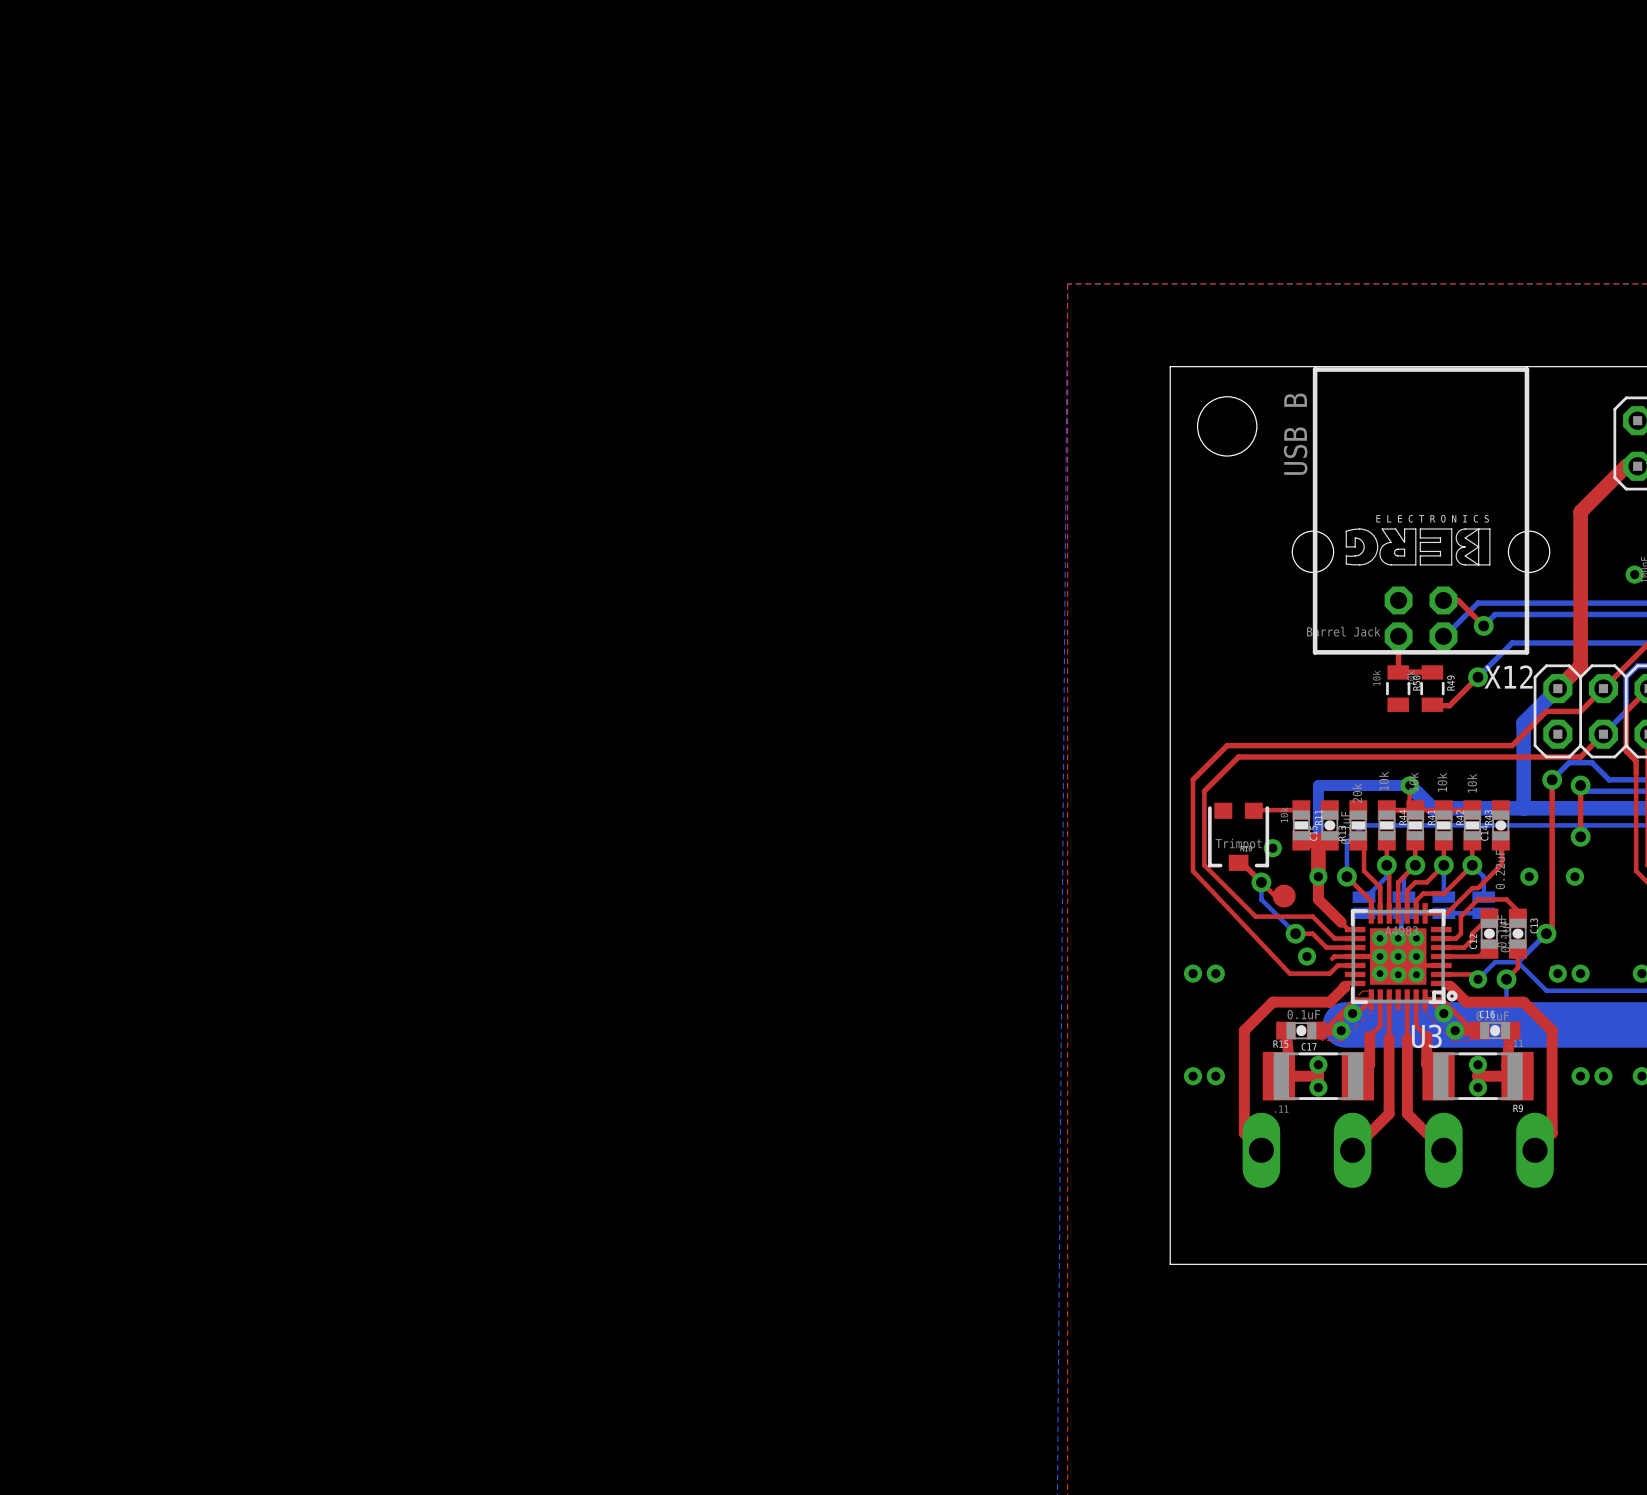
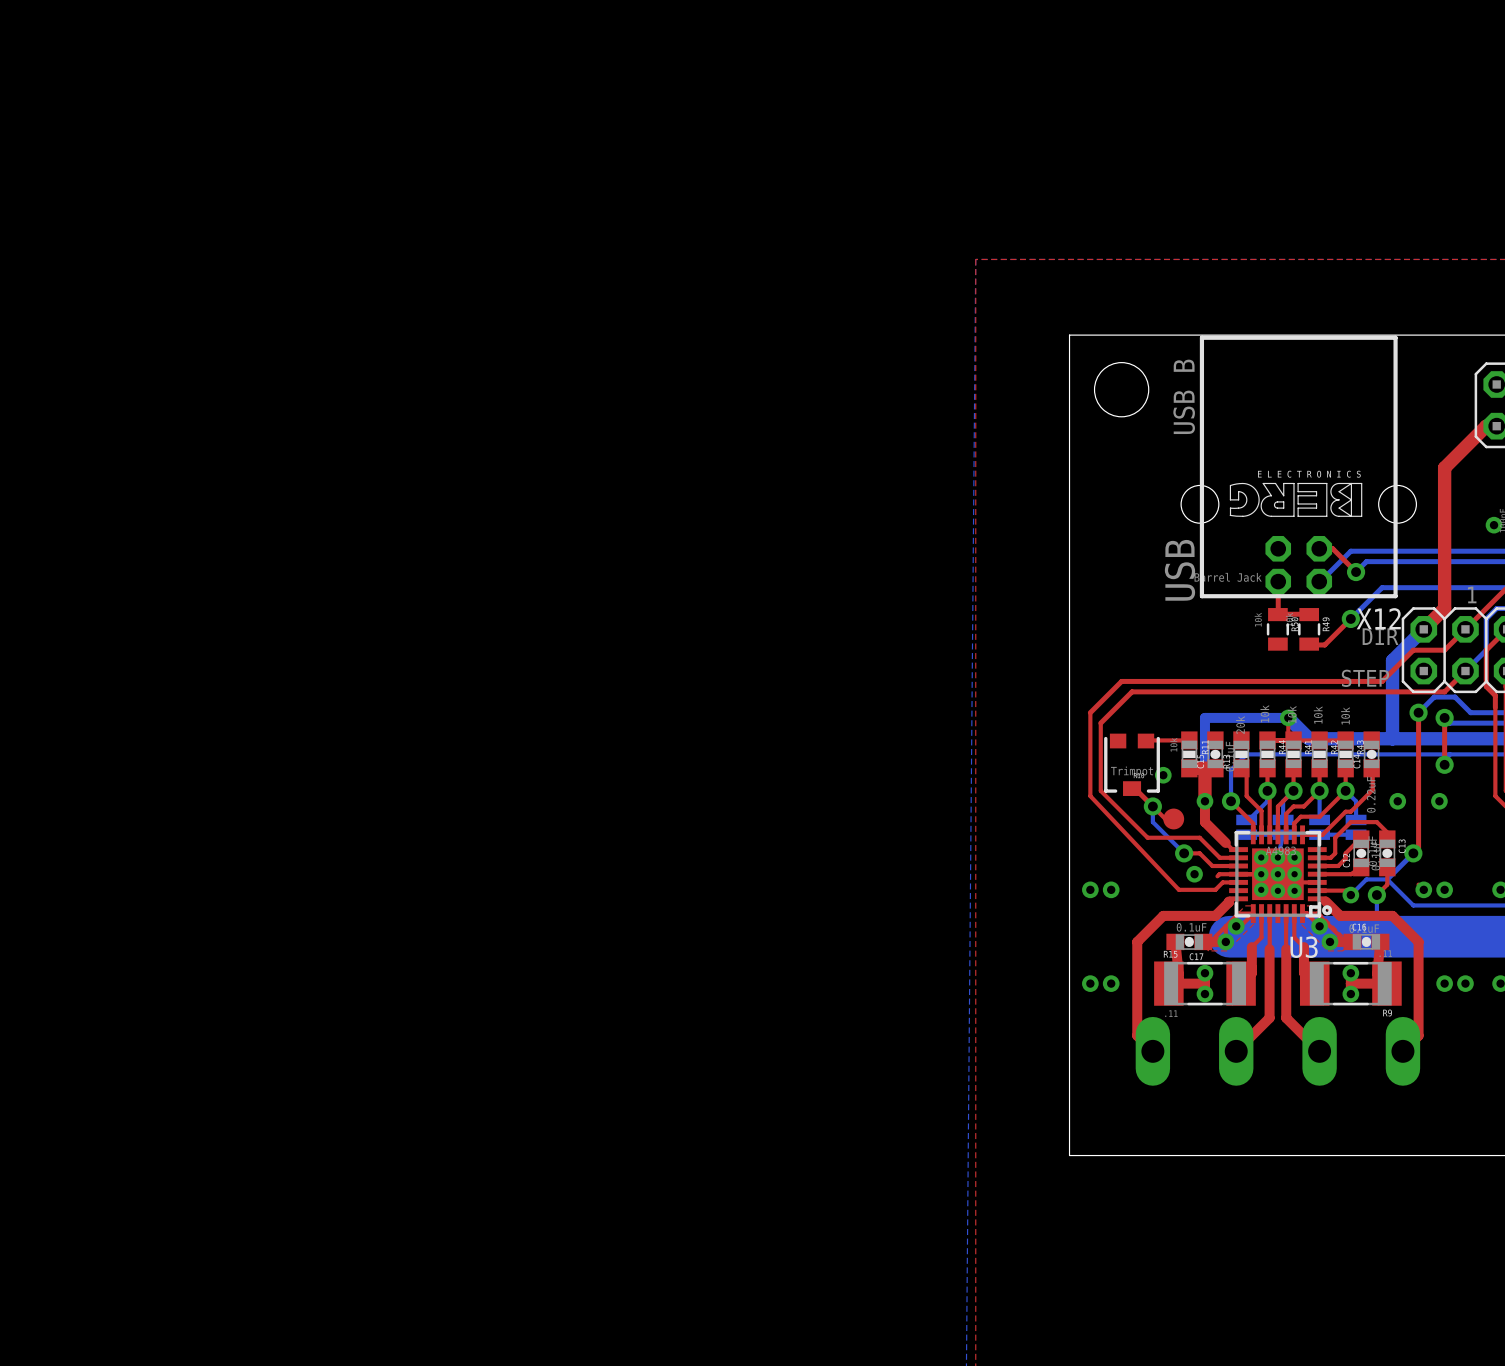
text: none -> USB (1179, 570)
text: none -> 1 (1472, 594)
text: none -> DIR (1380, 636)
text: none -> STEP (1365, 678)

